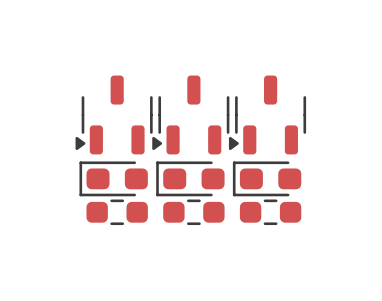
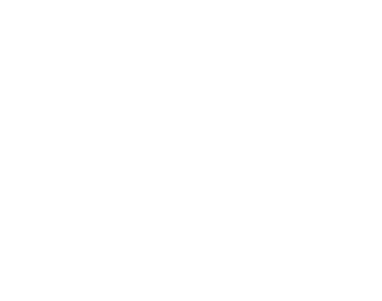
part: (114, 114) -> none
part: (190, 114) -> none
part: (267, 114) -> none
part: (113, 178) -> none
part: (190, 178) -> none
part: (267, 178) -> none
part: (117, 212) -> none
part: (193, 212) -> none
part: (270, 212) -> none

